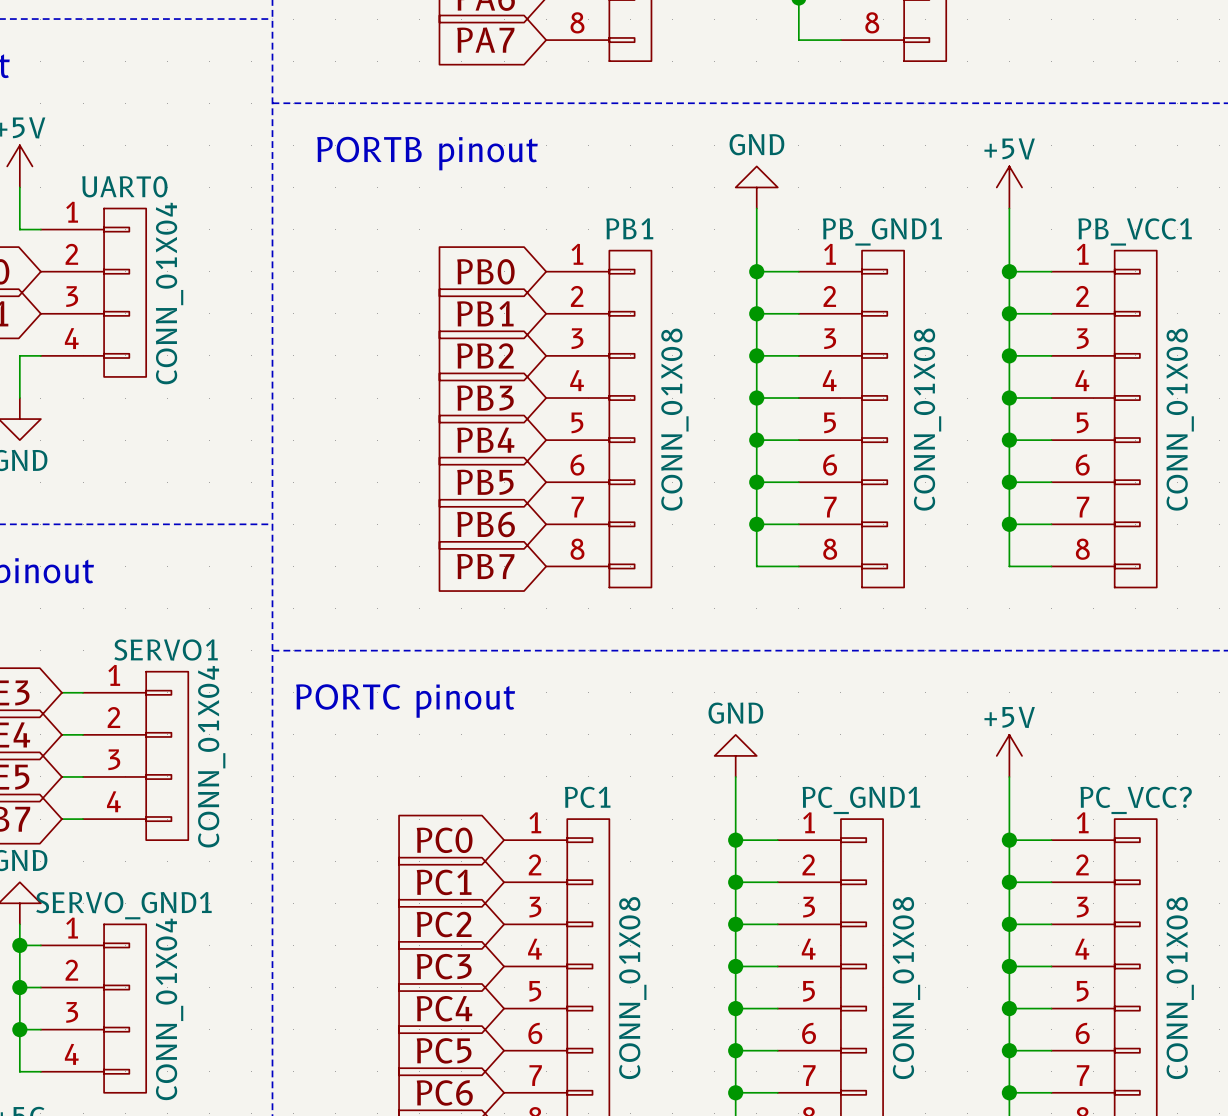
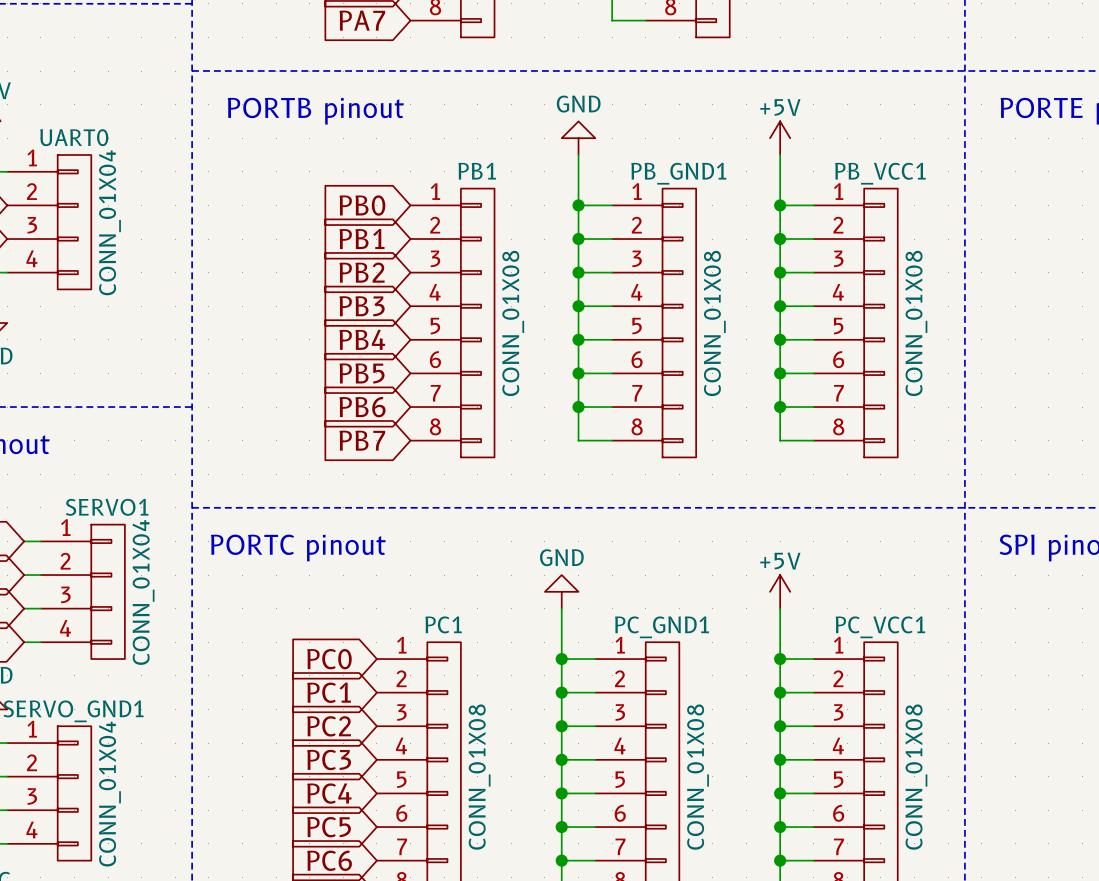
PC_VCC? name: PC_VCC? (1136, 800) -> PC_VCC1 (880, 627)

